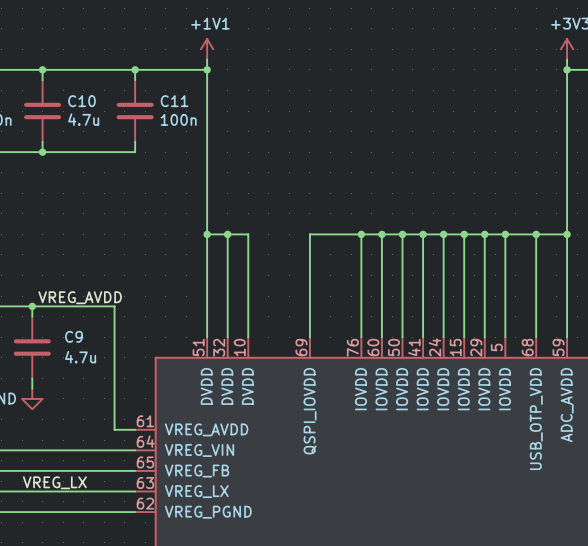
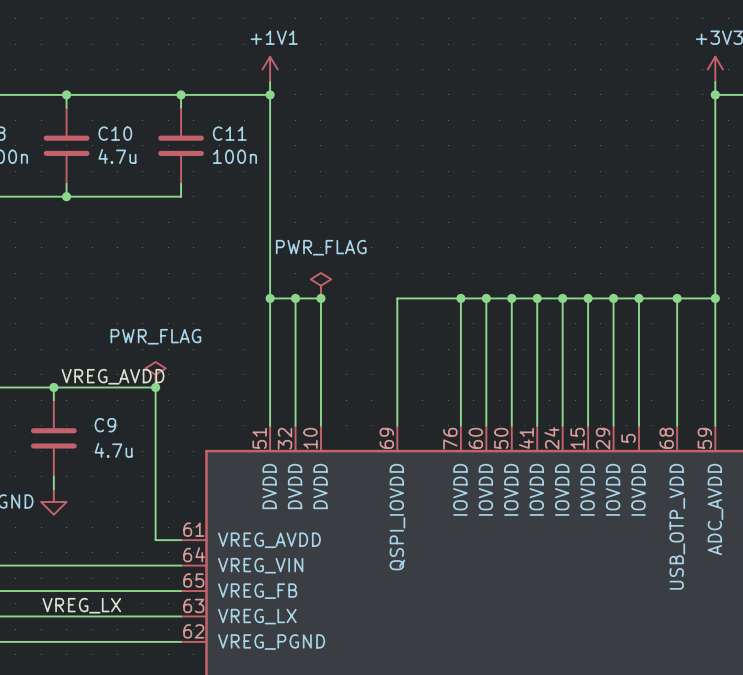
power symbol: none -> PWR_FLAG (320, 285)
junction: none -> (320, 298)
power symbol: none -> PWR_FLAG (155, 374)
junction: none -> (155, 387)

